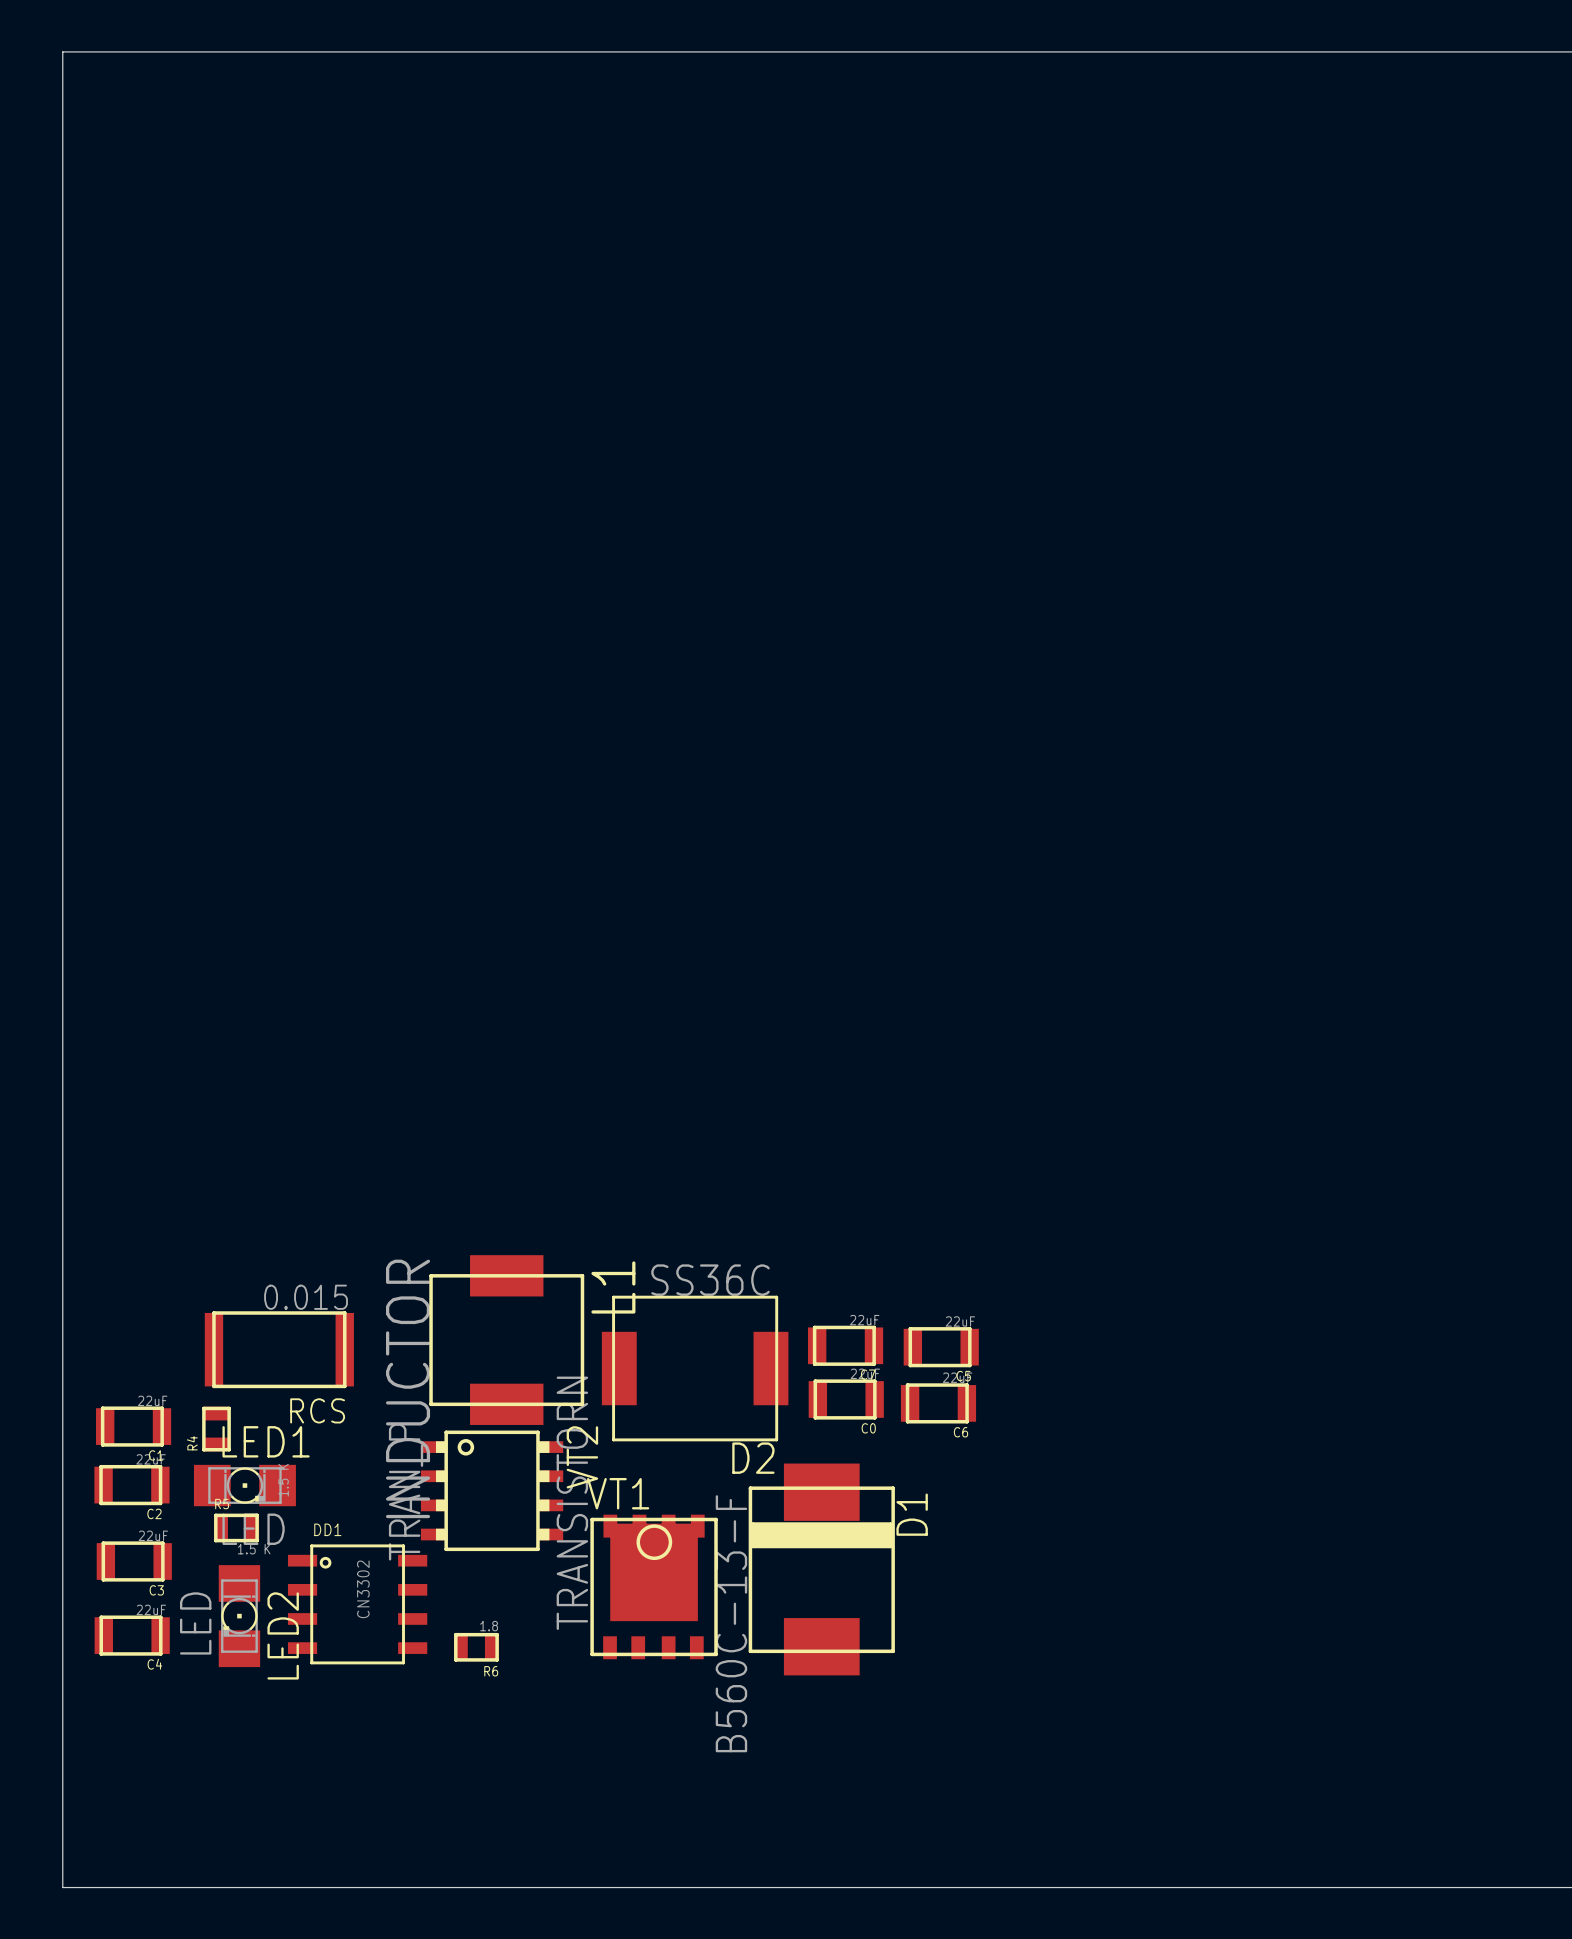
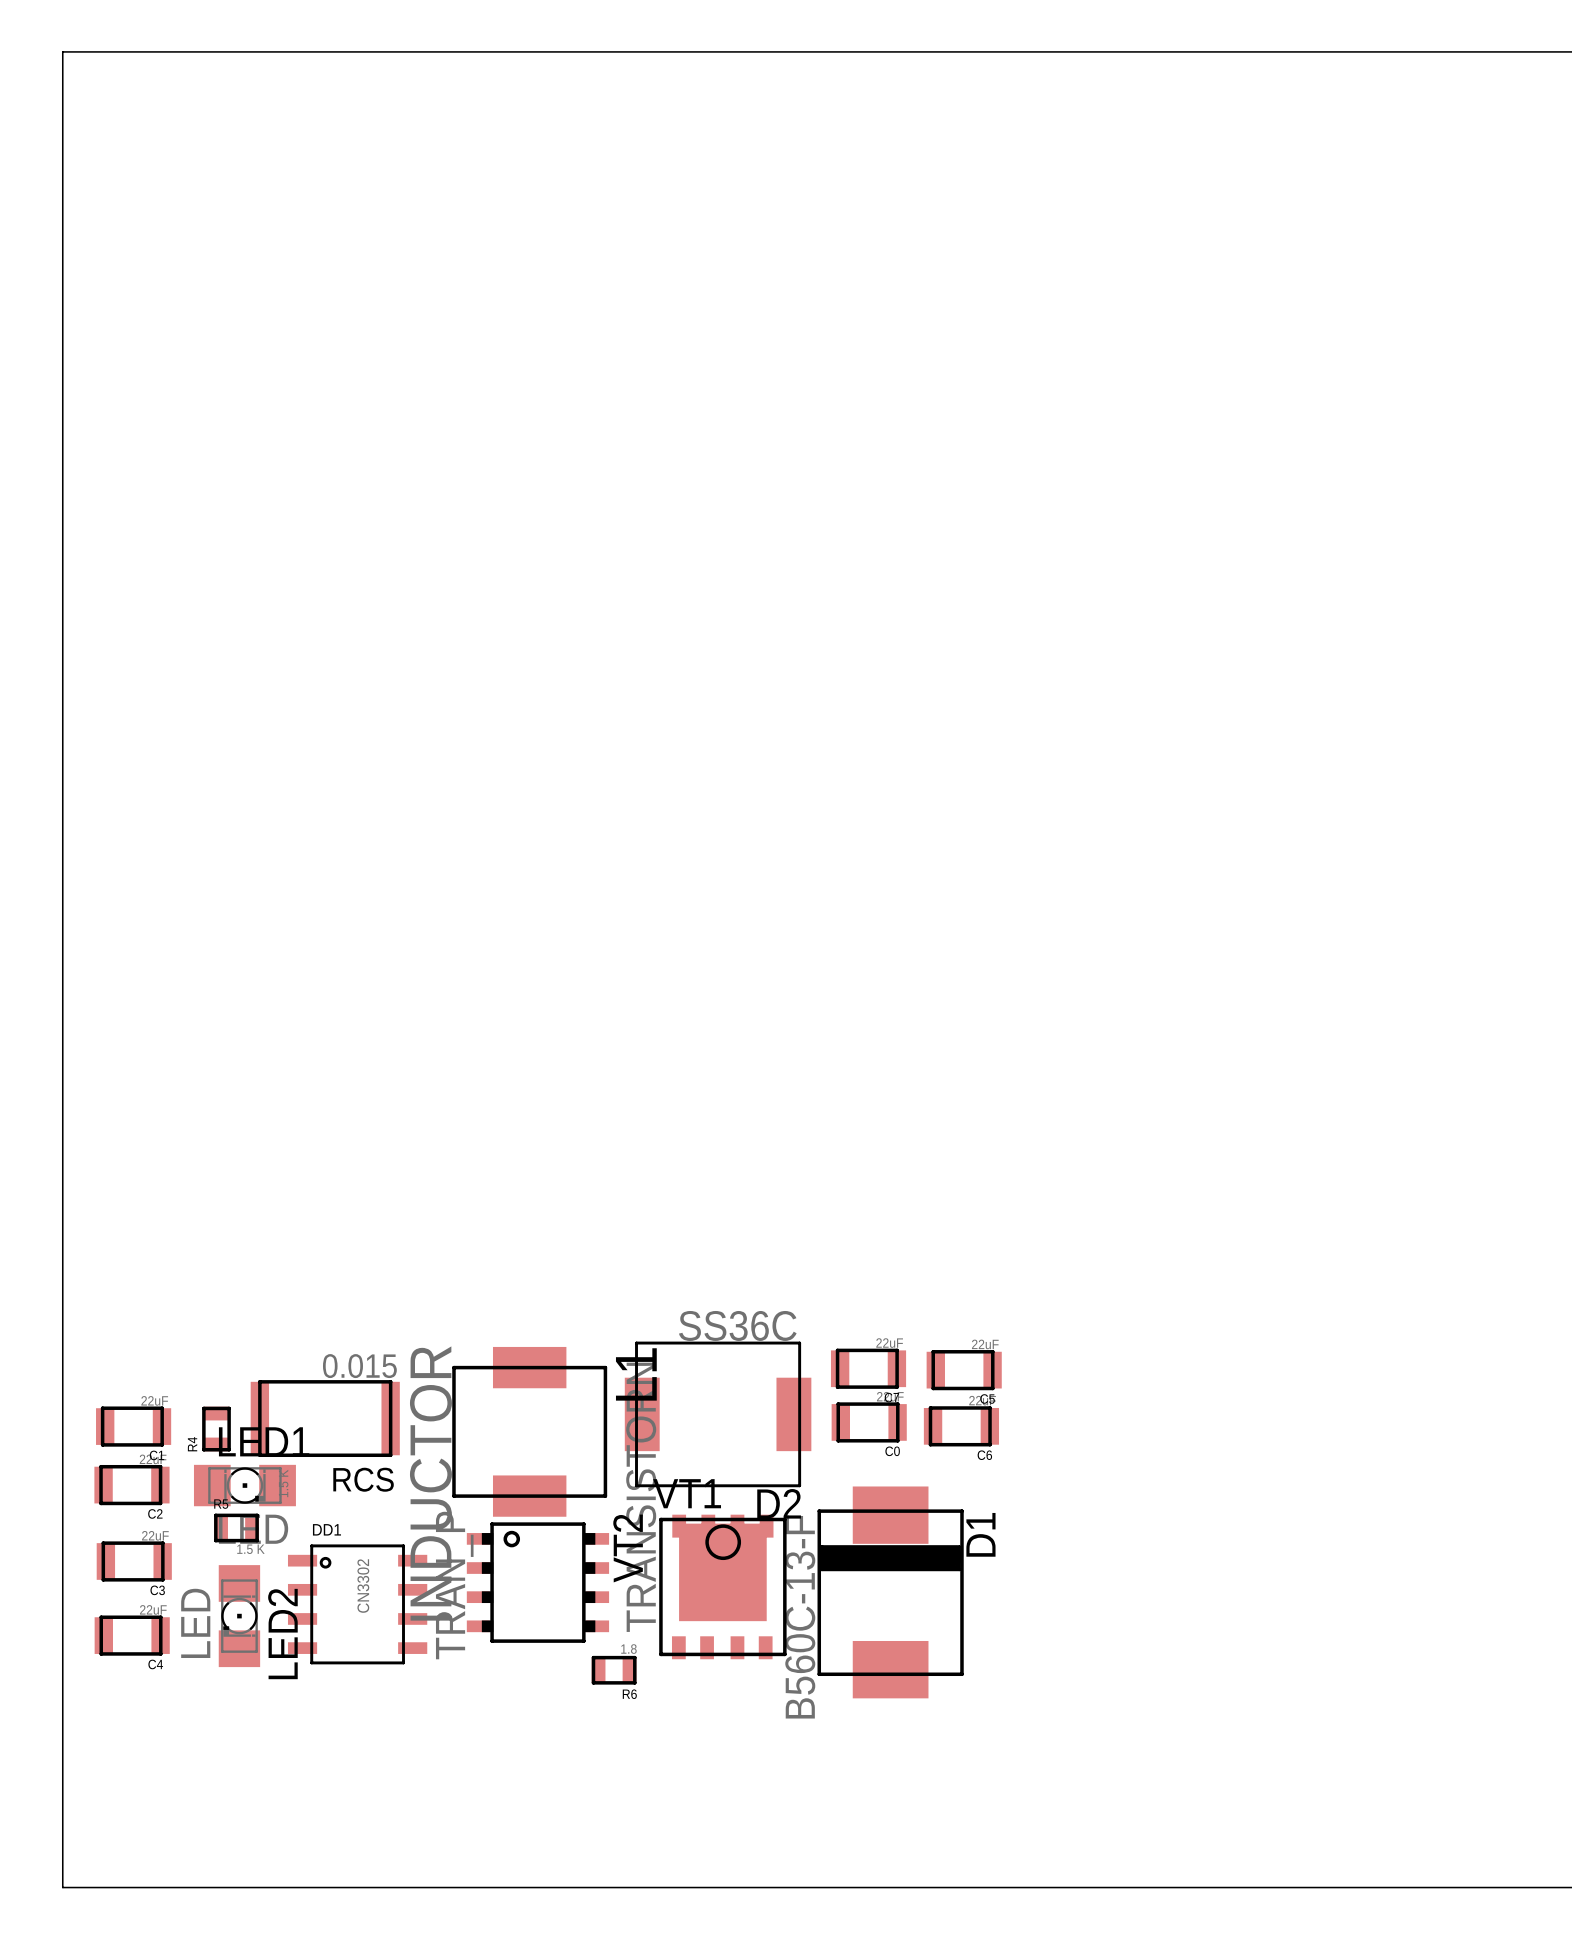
L1 position: (506, 1340) -> (529, 1431)
C7 position: (845, 1345) -> (868, 1368)
C5 position: (941, 1347) -> (964, 1370)
RCS position: (279, 1349) -> (325, 1418)
D2 position: (695, 1368) -> (718, 1414)
C0 position: (846, 1399) -> (869, 1422)
C6 position: (938, 1403) -> (961, 1426)
VT2 position: (492, 1490) -> (537, 1582)
D1 position: (821, 1569) -> (890, 1592)
VT1 position: (654, 1586) -> (722, 1586)
R6 position: (476, 1647) -> (614, 1670)

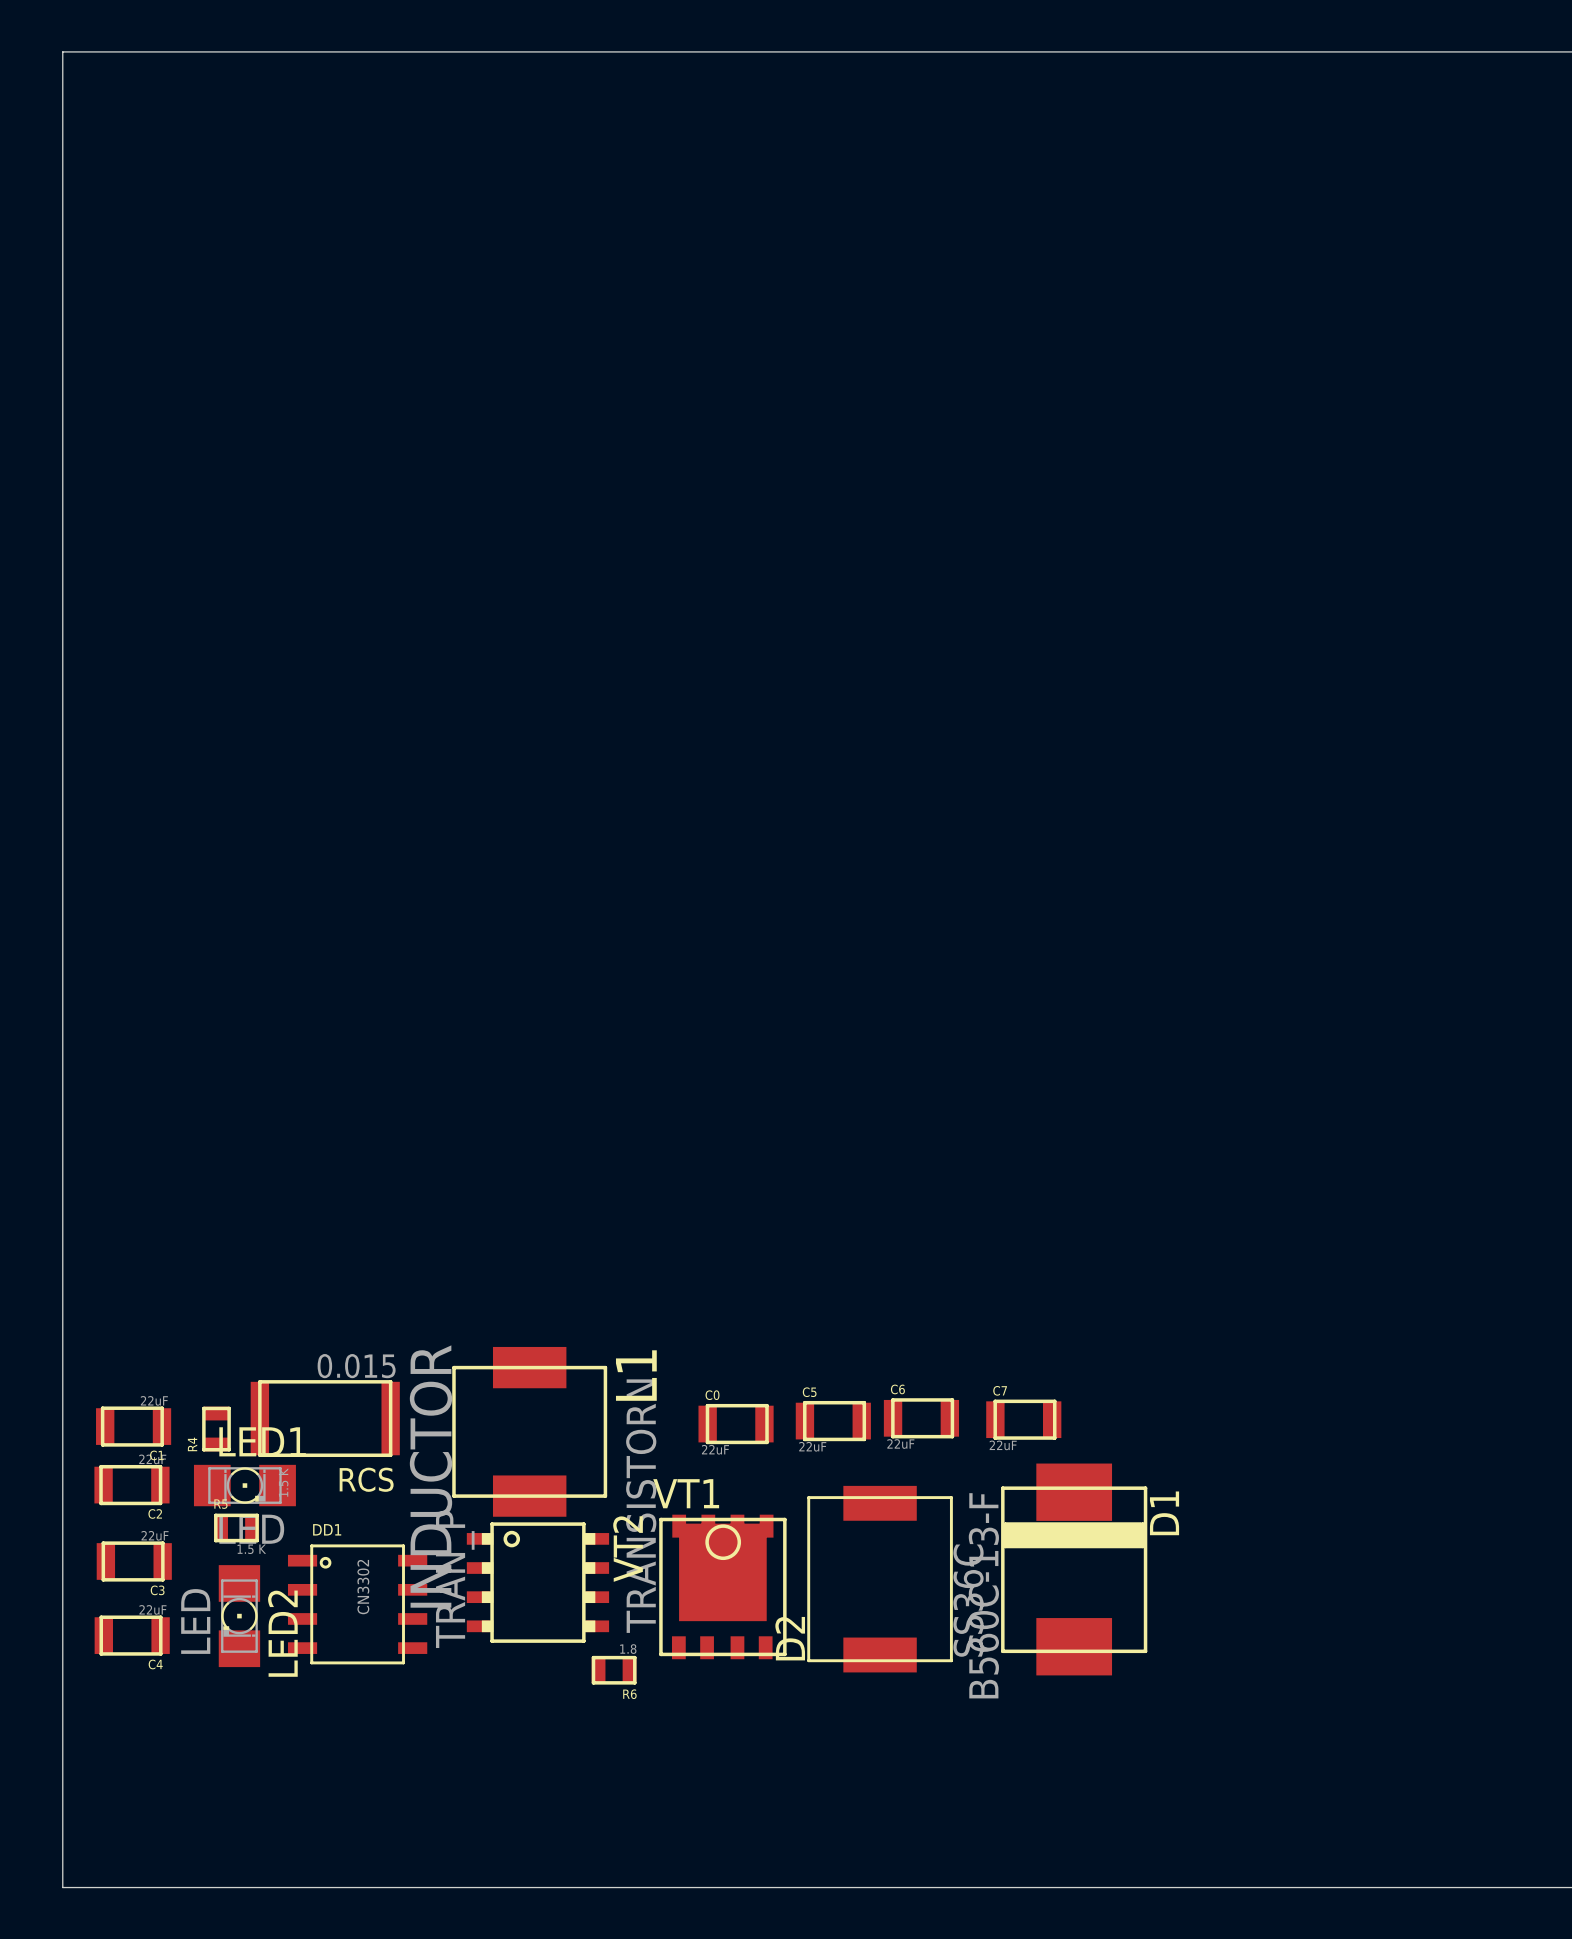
C7 rotation: 0° (868, 1368) -> 180° (1023, 1419)
C7 position: (868, 1368) -> (1023, 1419)
C5 rotation: 0° (964, 1370) -> 180° (833, 1421)
C5 position: (964, 1370) -> (833, 1421)
D2 rotation: 0° (718, 1414) -> 90° clockwise (880, 1579)
D2 position: (718, 1414) -> (880, 1579)
C0 rotation: 0° (869, 1422) -> 180° (736, 1424)
C0 position: (869, 1422) -> (736, 1424)
C6 rotation: 0° (961, 1426) -> 180° (921, 1418)
D1 position: (890, 1592) -> (1074, 1569)

